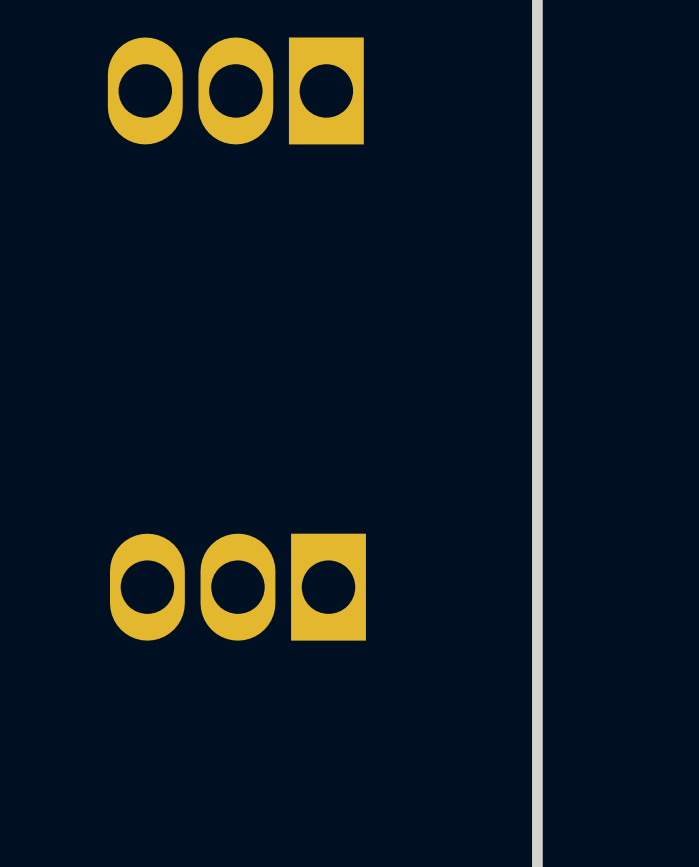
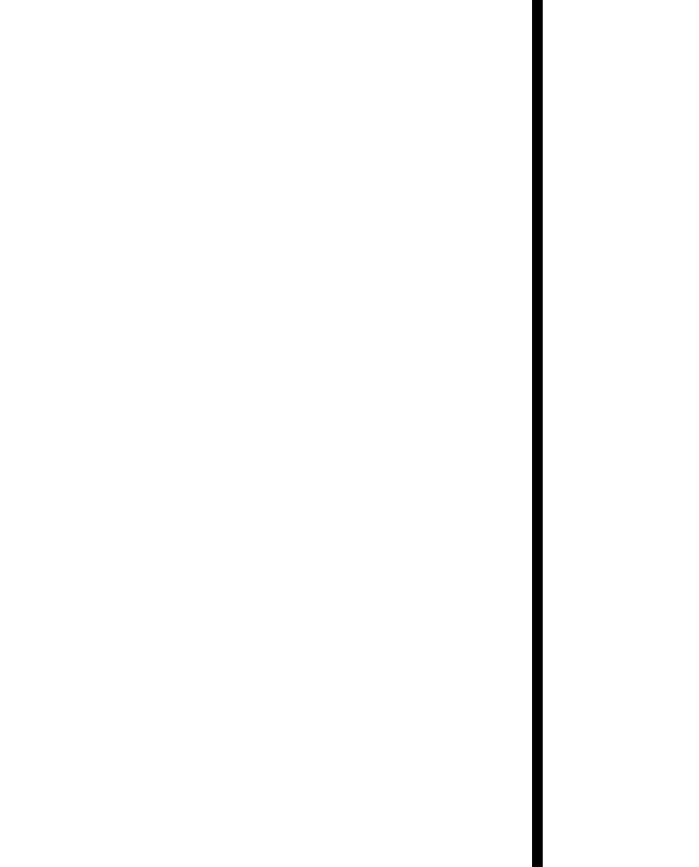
part: (235, 90) -> none
part: (237, 587) -> none

